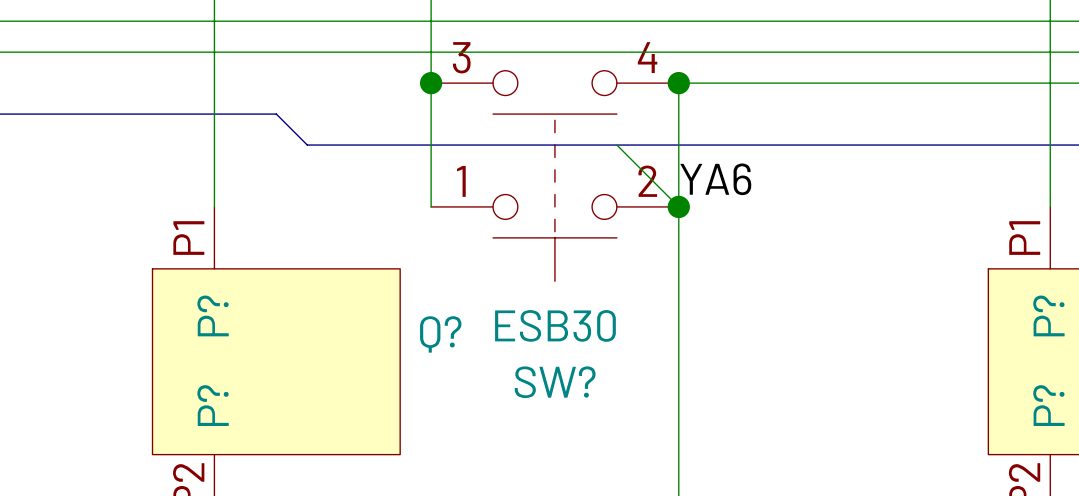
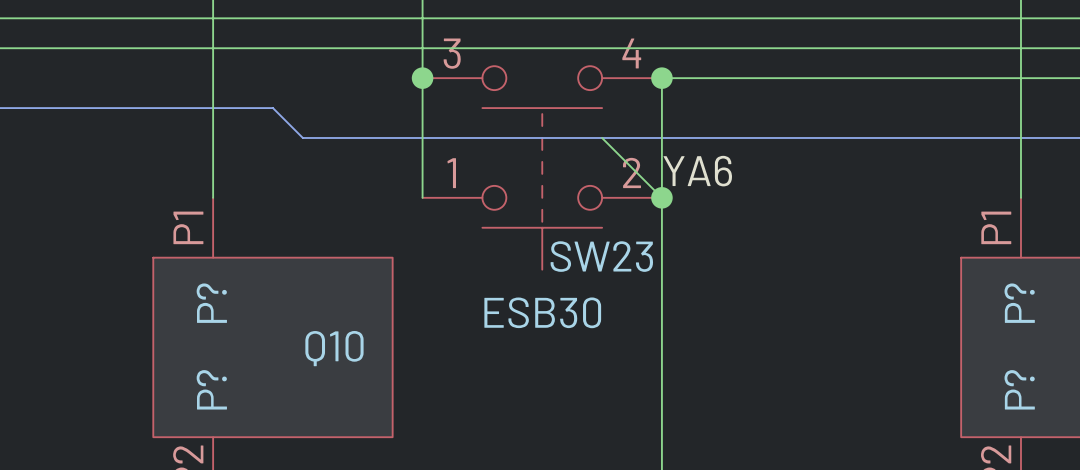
Q? name: Q? (440, 334) -> Q10 (334, 348)
SW? name: SW? (555, 382) -> SW23 (601, 256)

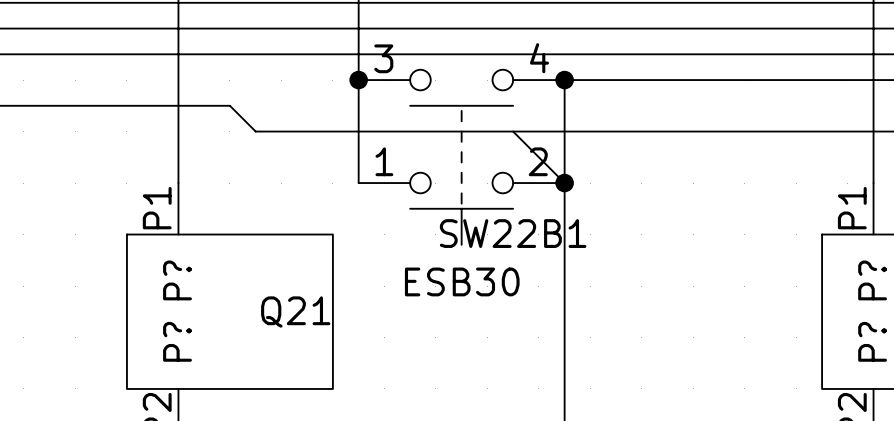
label: YA6 (697, 171) -> none
SW23 name: SW23 (601, 256) -> SW22B1 (513, 233)
Q10 name: Q10 (334, 348) -> Q21 (295, 312)

